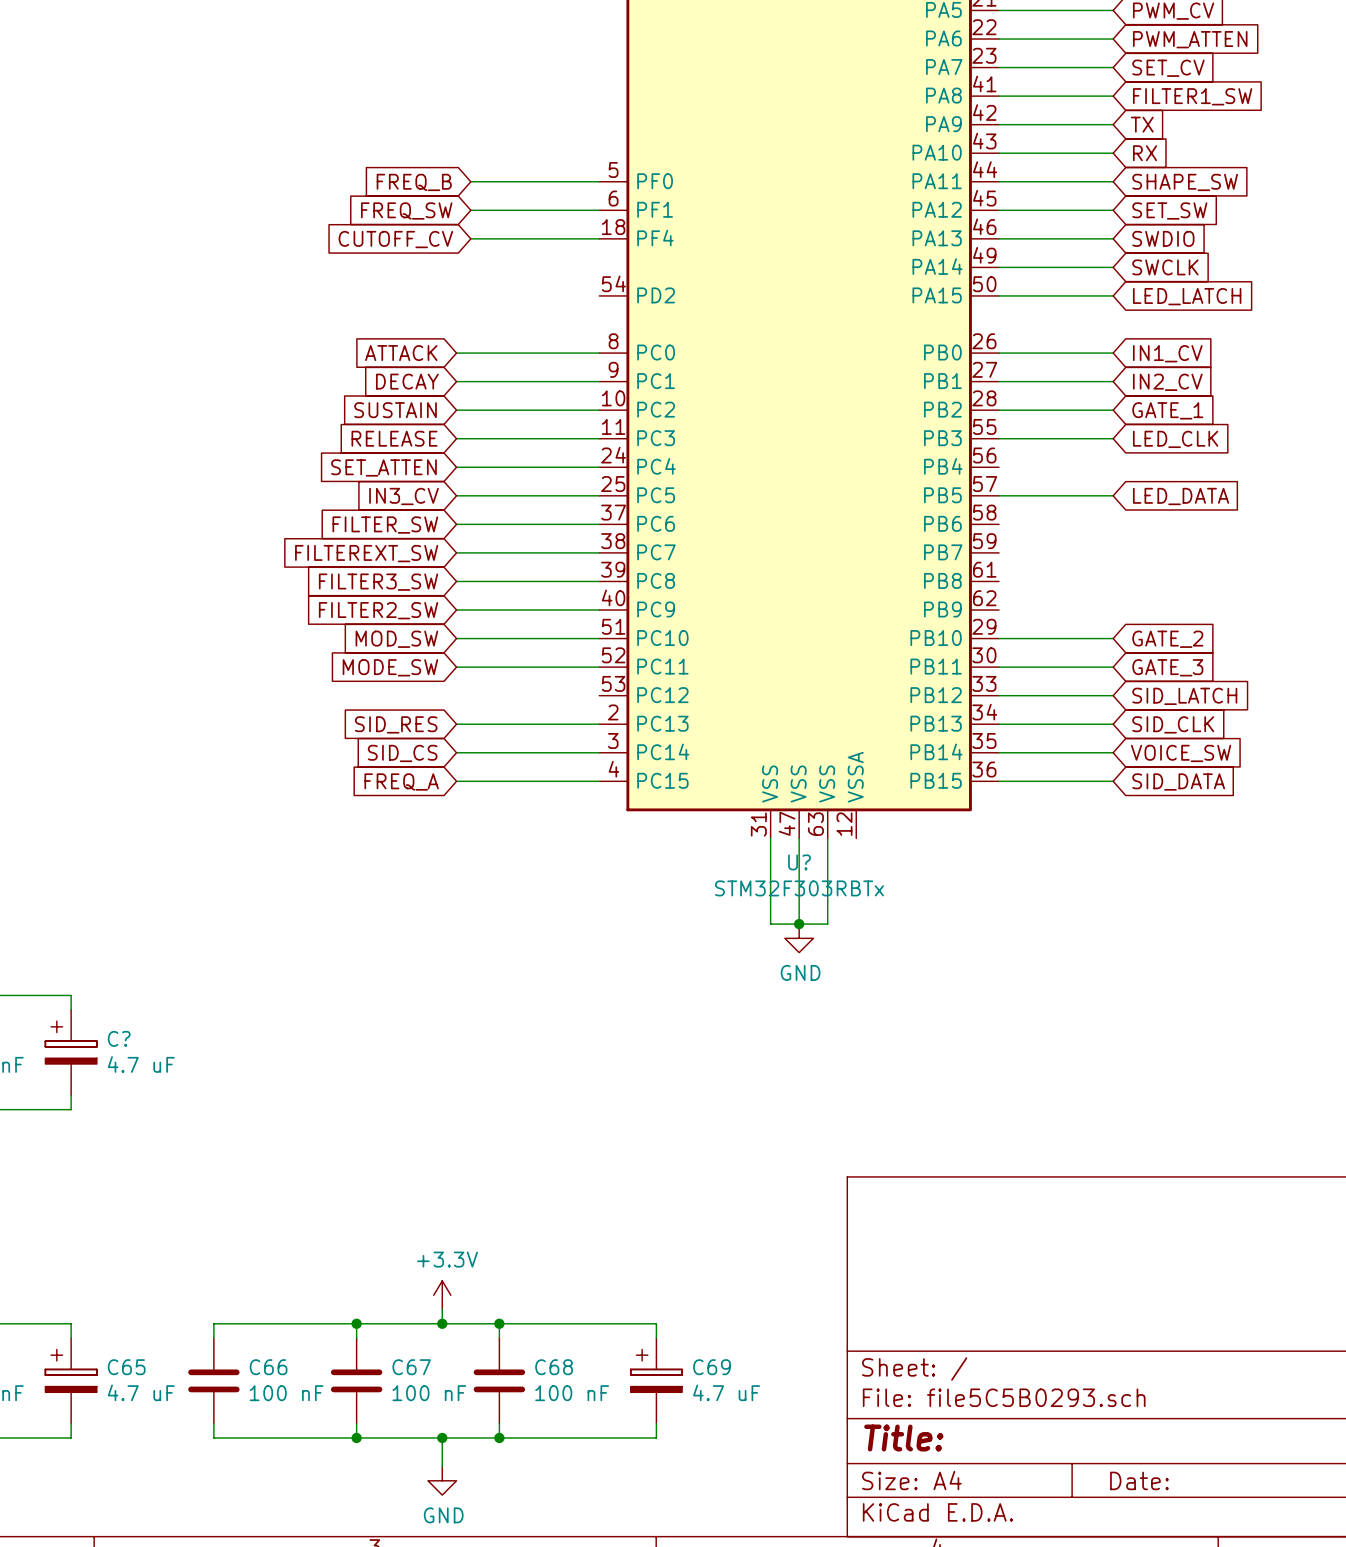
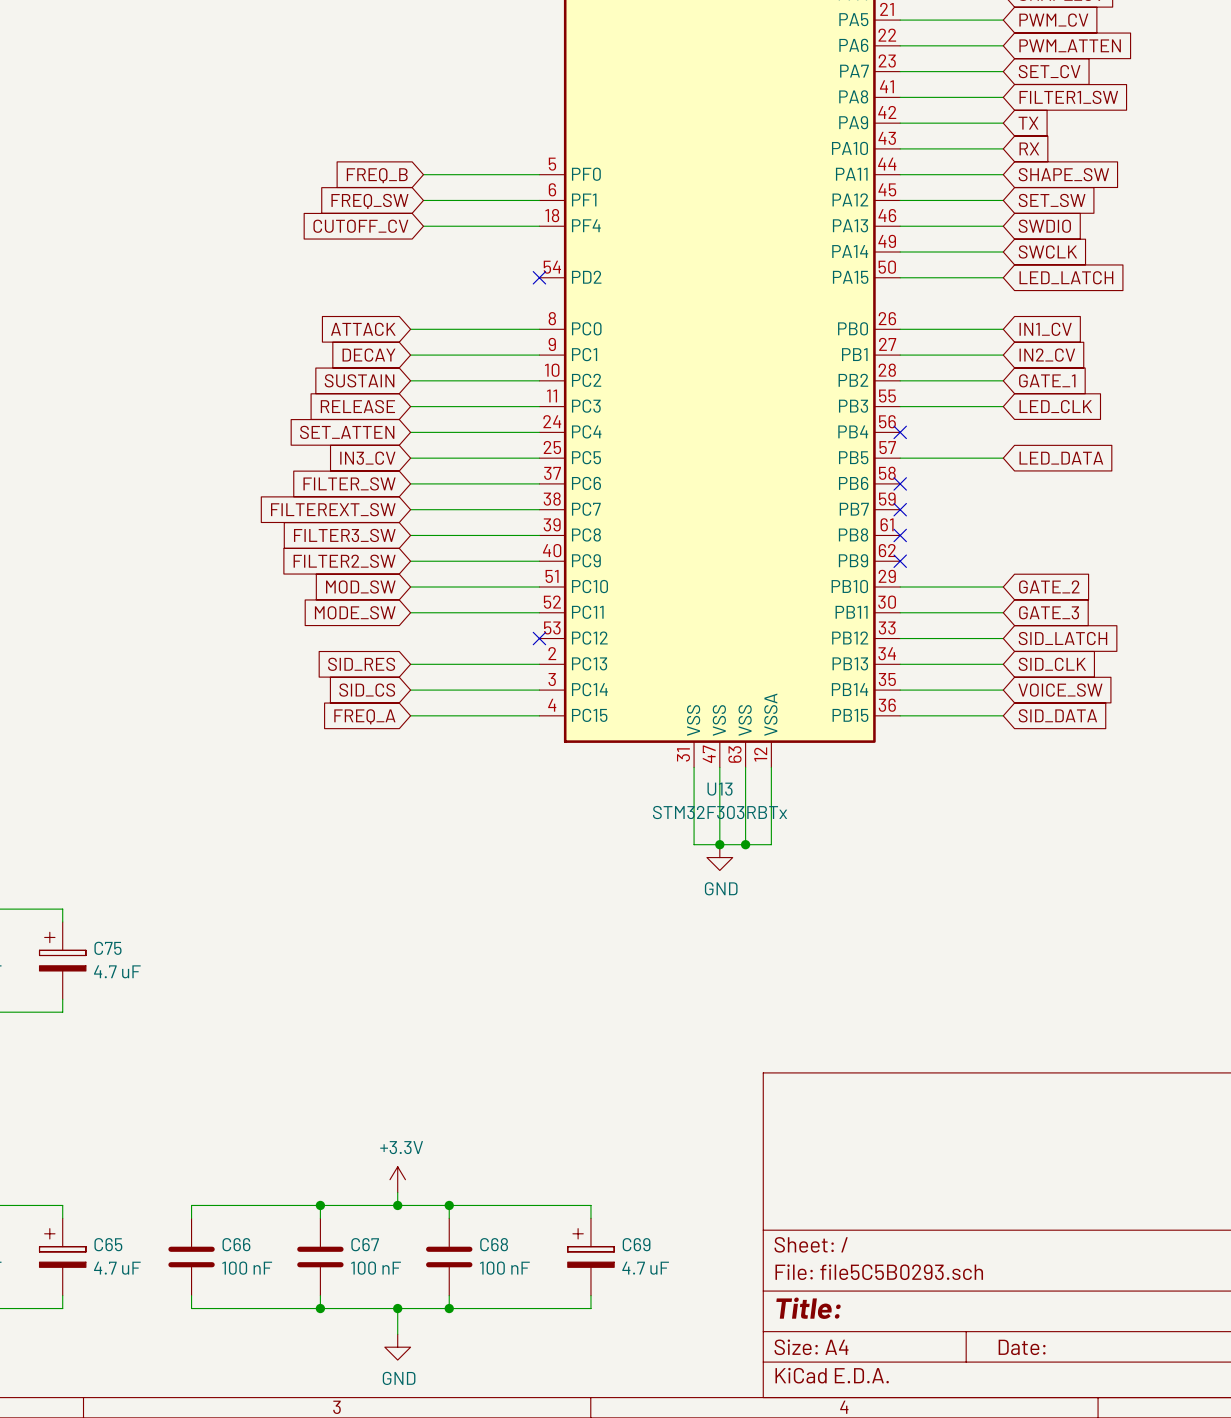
no-connect mark: none -> (539, 277)
no-connect mark: none -> (900, 432)
no-connect mark: none -> (900, 483)
no-connect mark: none -> (900, 509)
no-connect mark: none -> (900, 535)
no-connect mark: none -> (900, 561)
no-connect mark: none -> (539, 638)
wire: none -> (771, 767) (771, 844) (745, 844)
U? name: U? (799, 862) -> U13 (720, 789)
junction: none -> (745, 844)
C? name: C? (119, 1038) -> C75 (107, 948)

